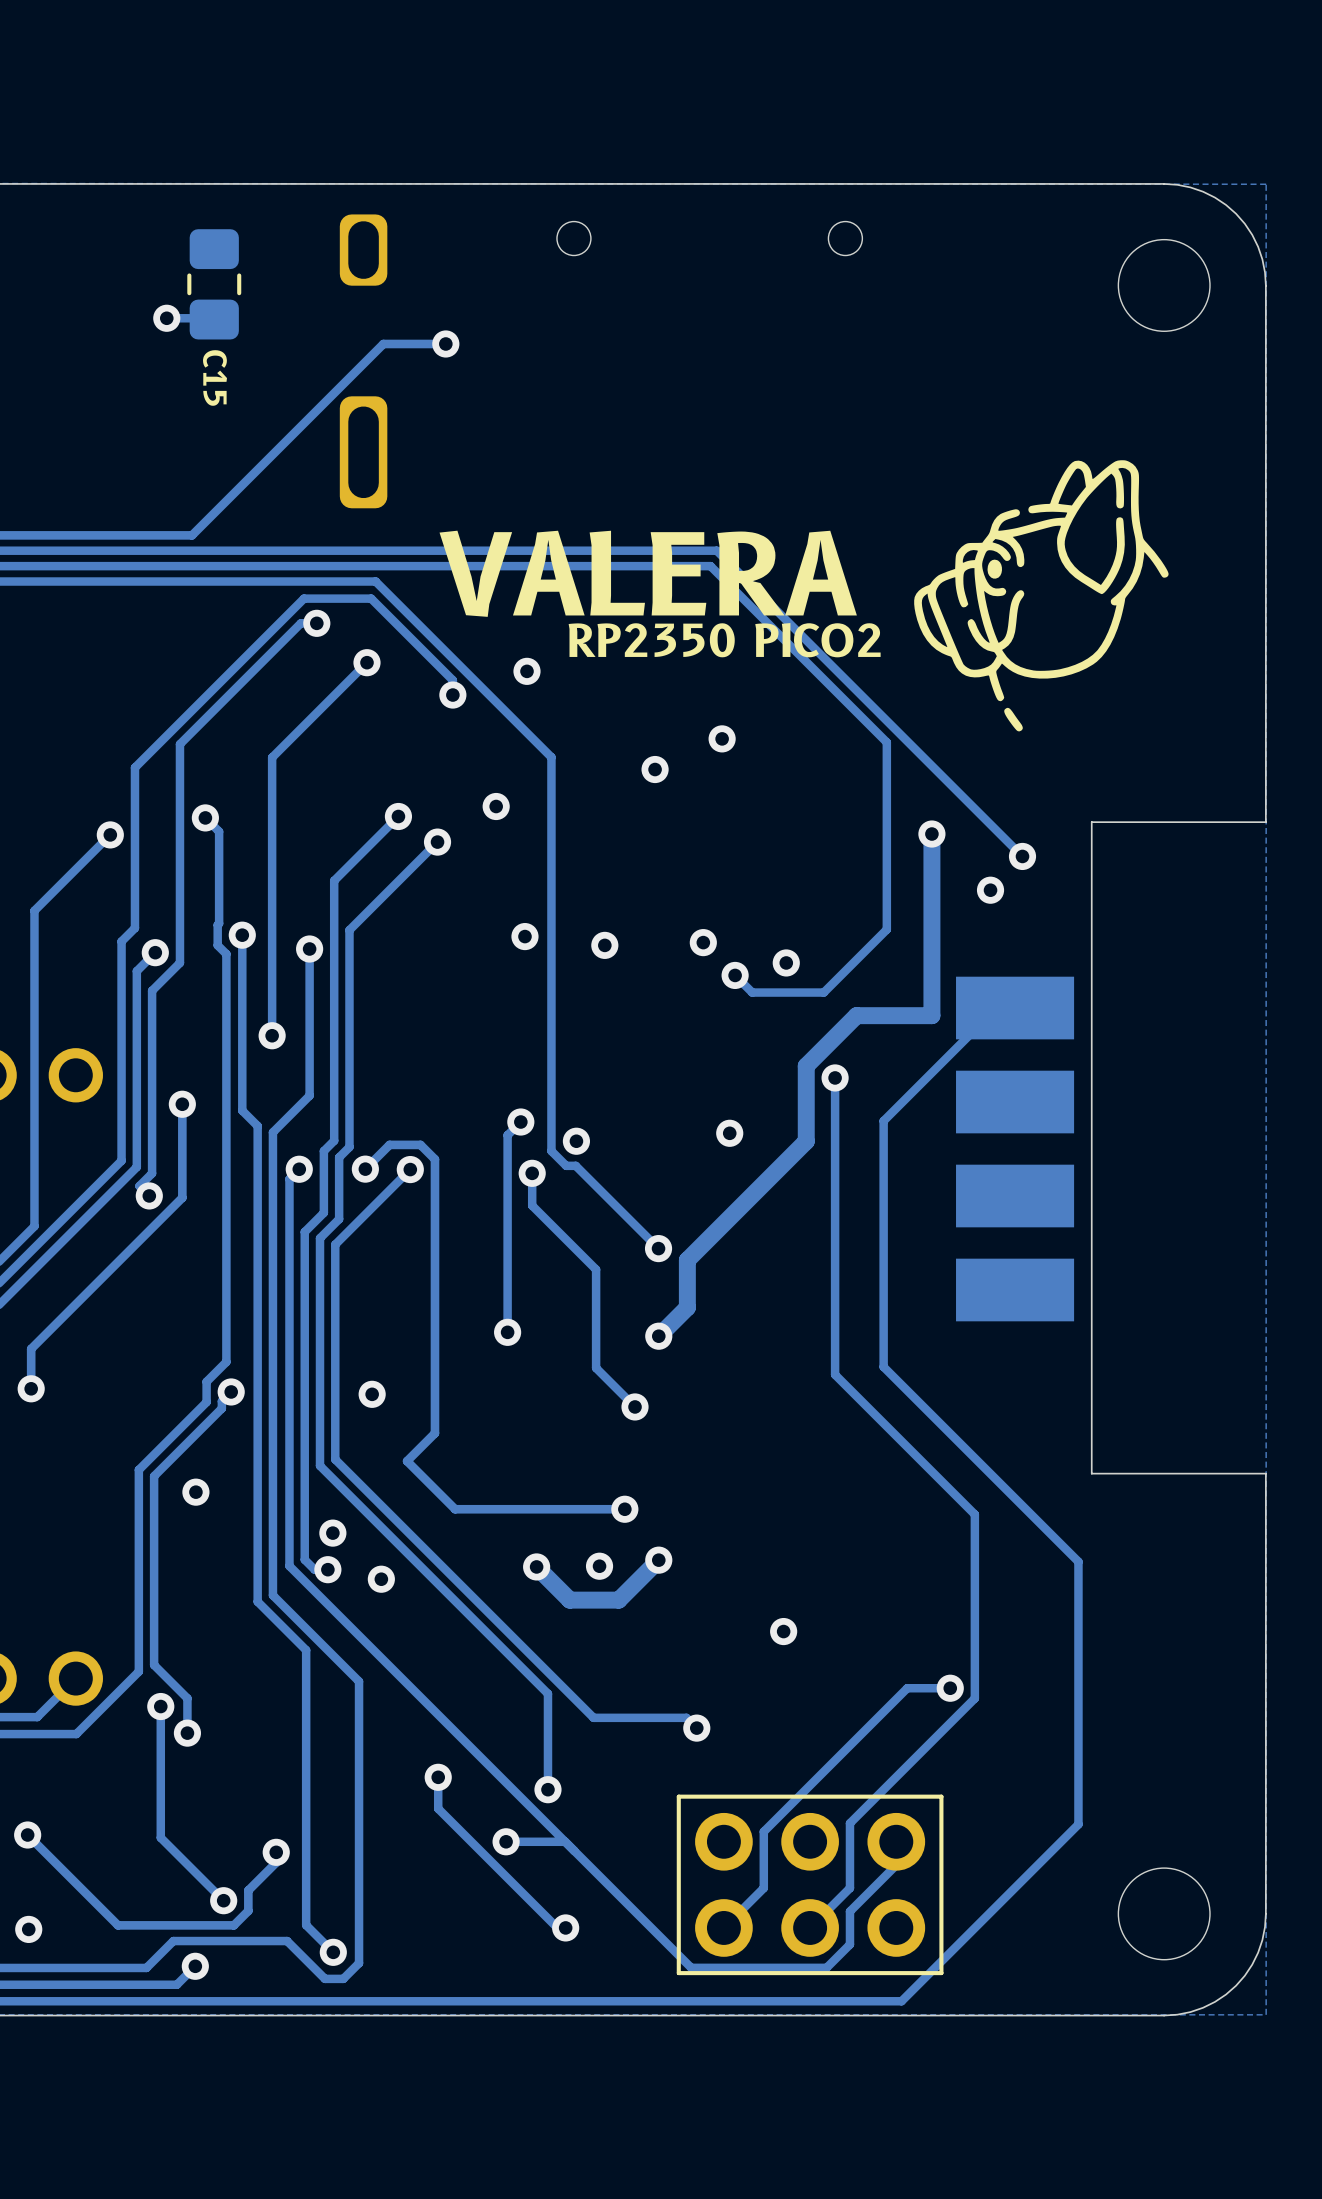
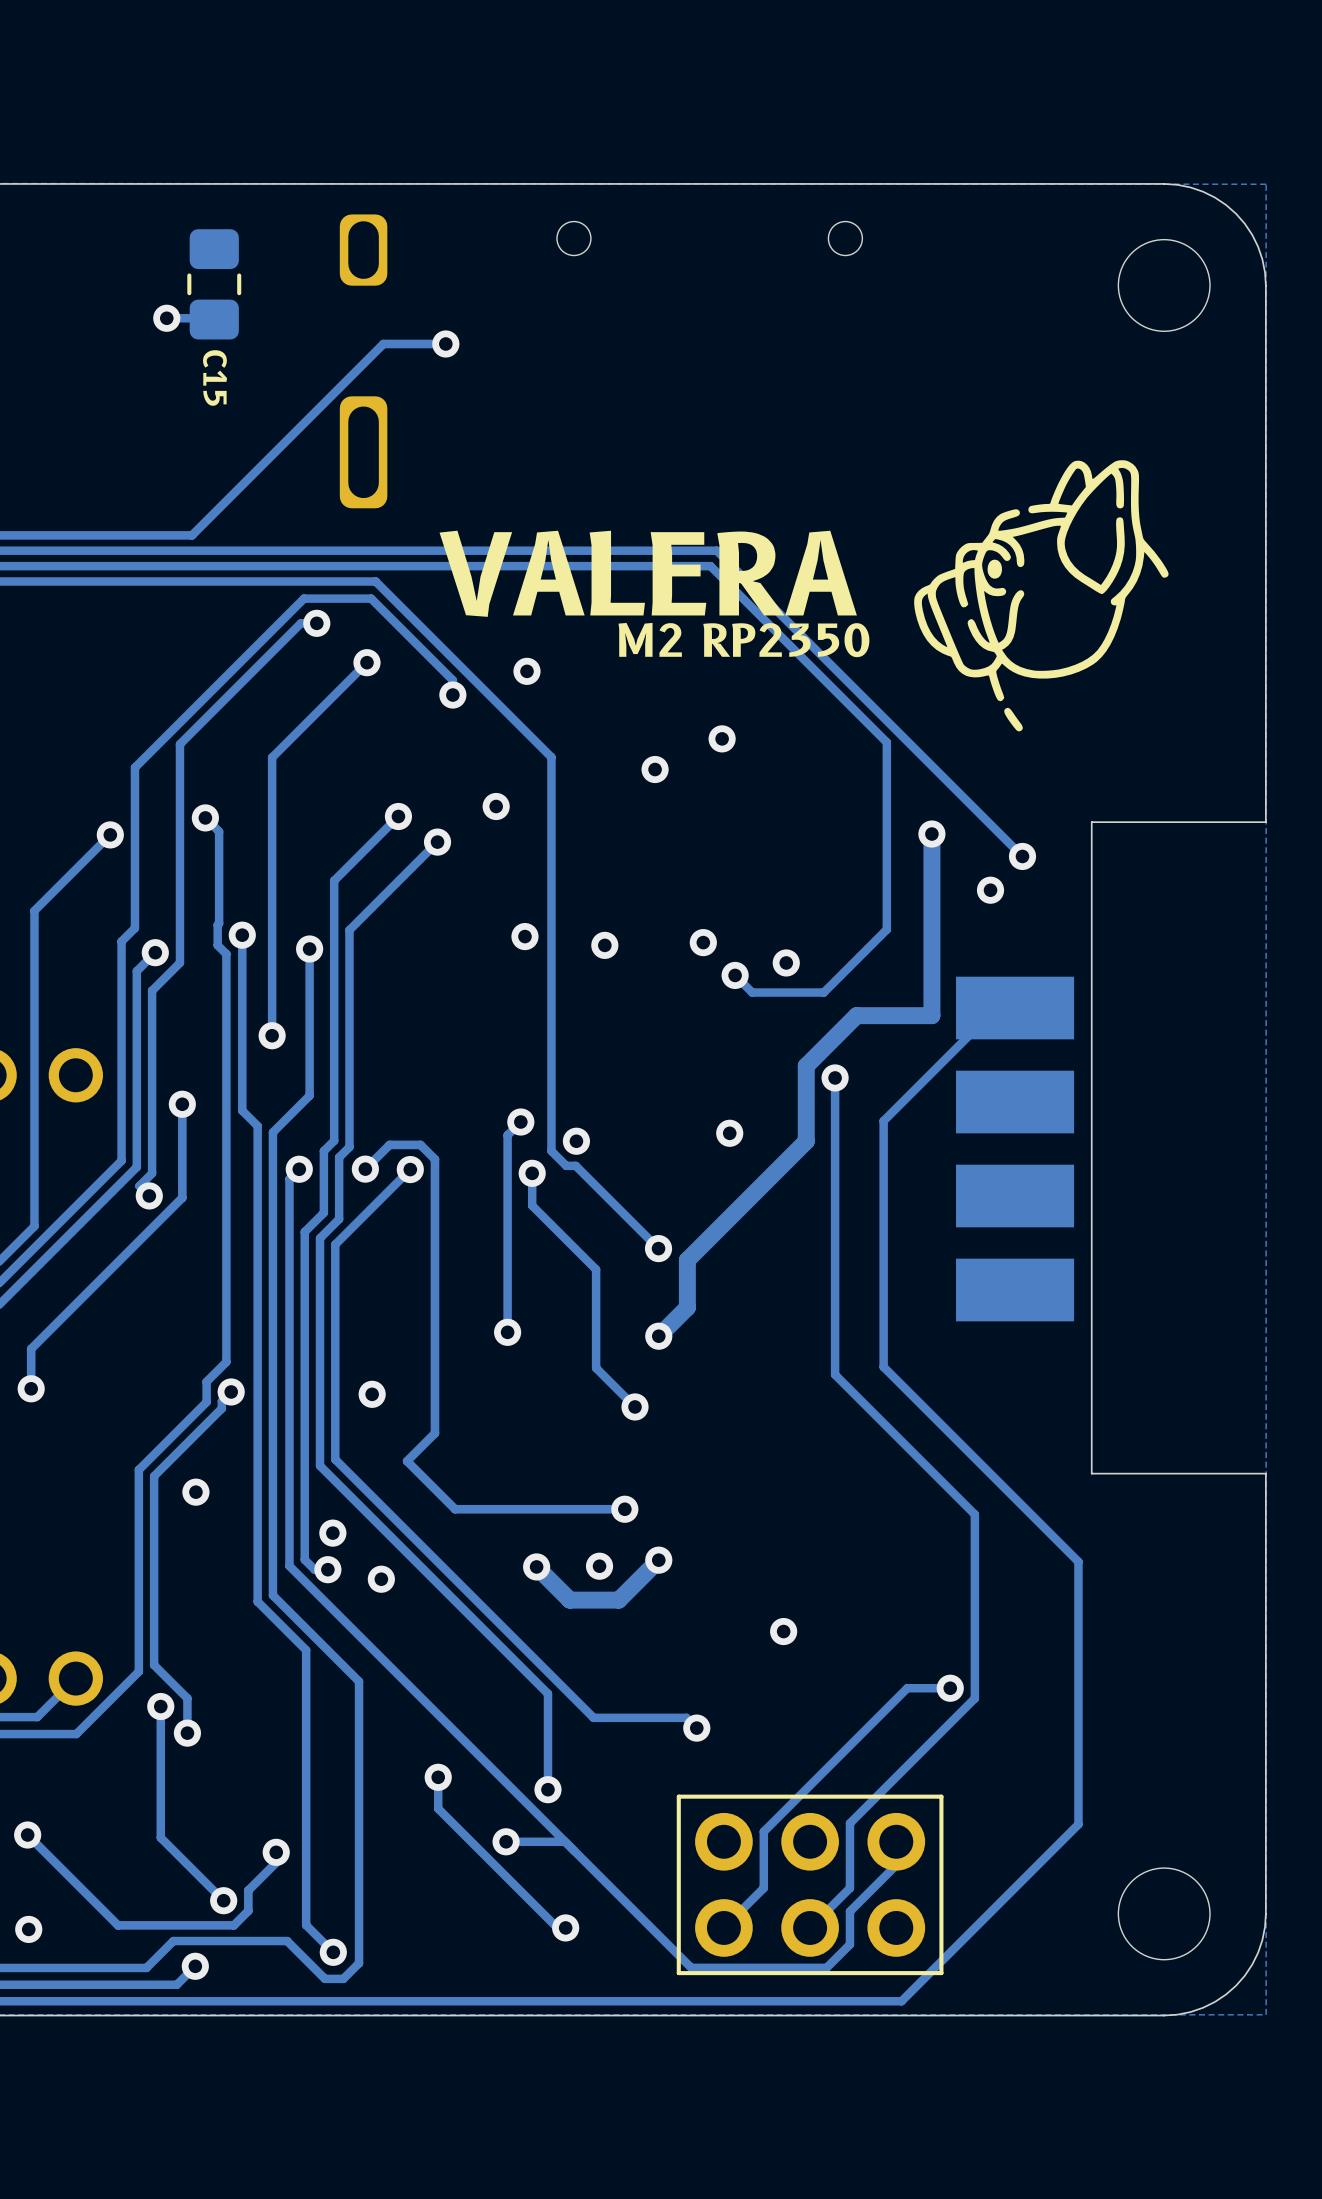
text: RP2350 PICO2 (724, 640) -> none
text: none -> M2 RP2350 (743, 640)

